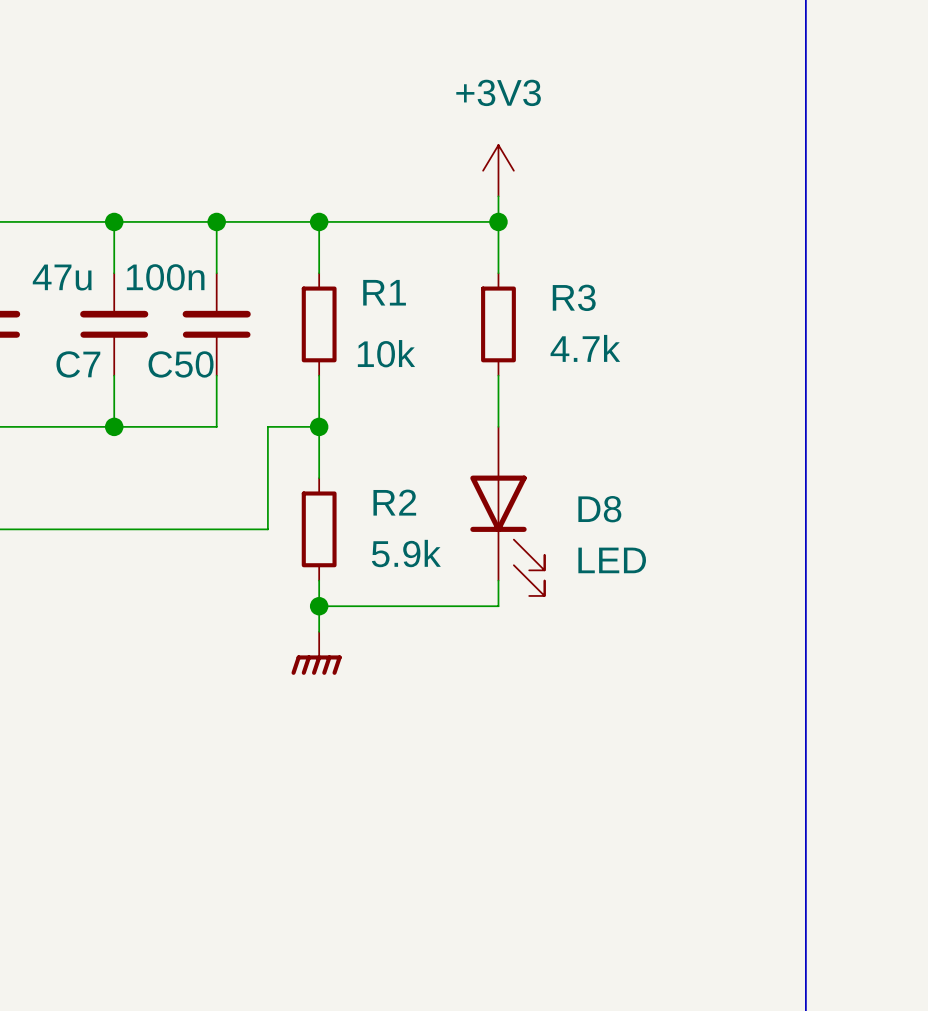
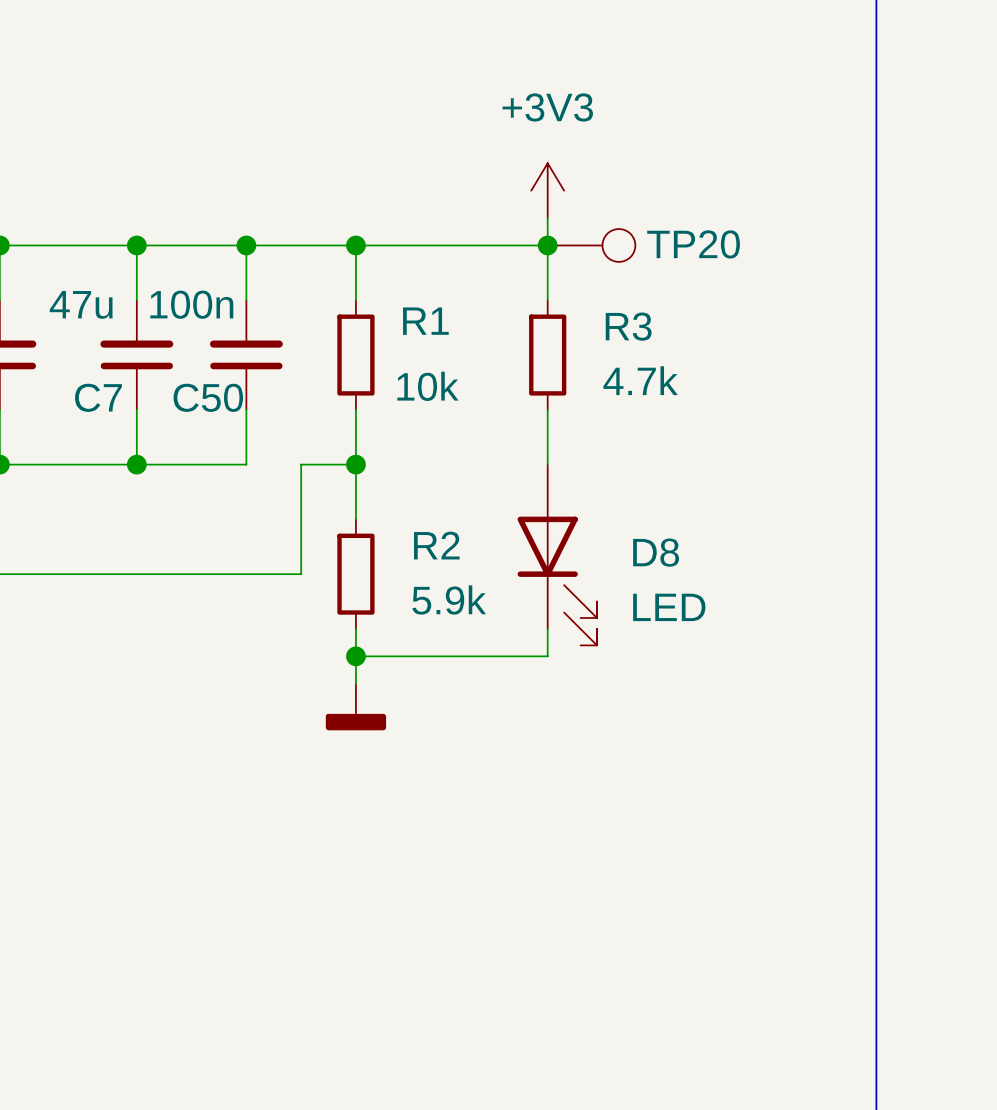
TP20: none -> (591, 245)
power symbol shape: [291, 631, 342, 675] -> [325, 683, 387, 731]

